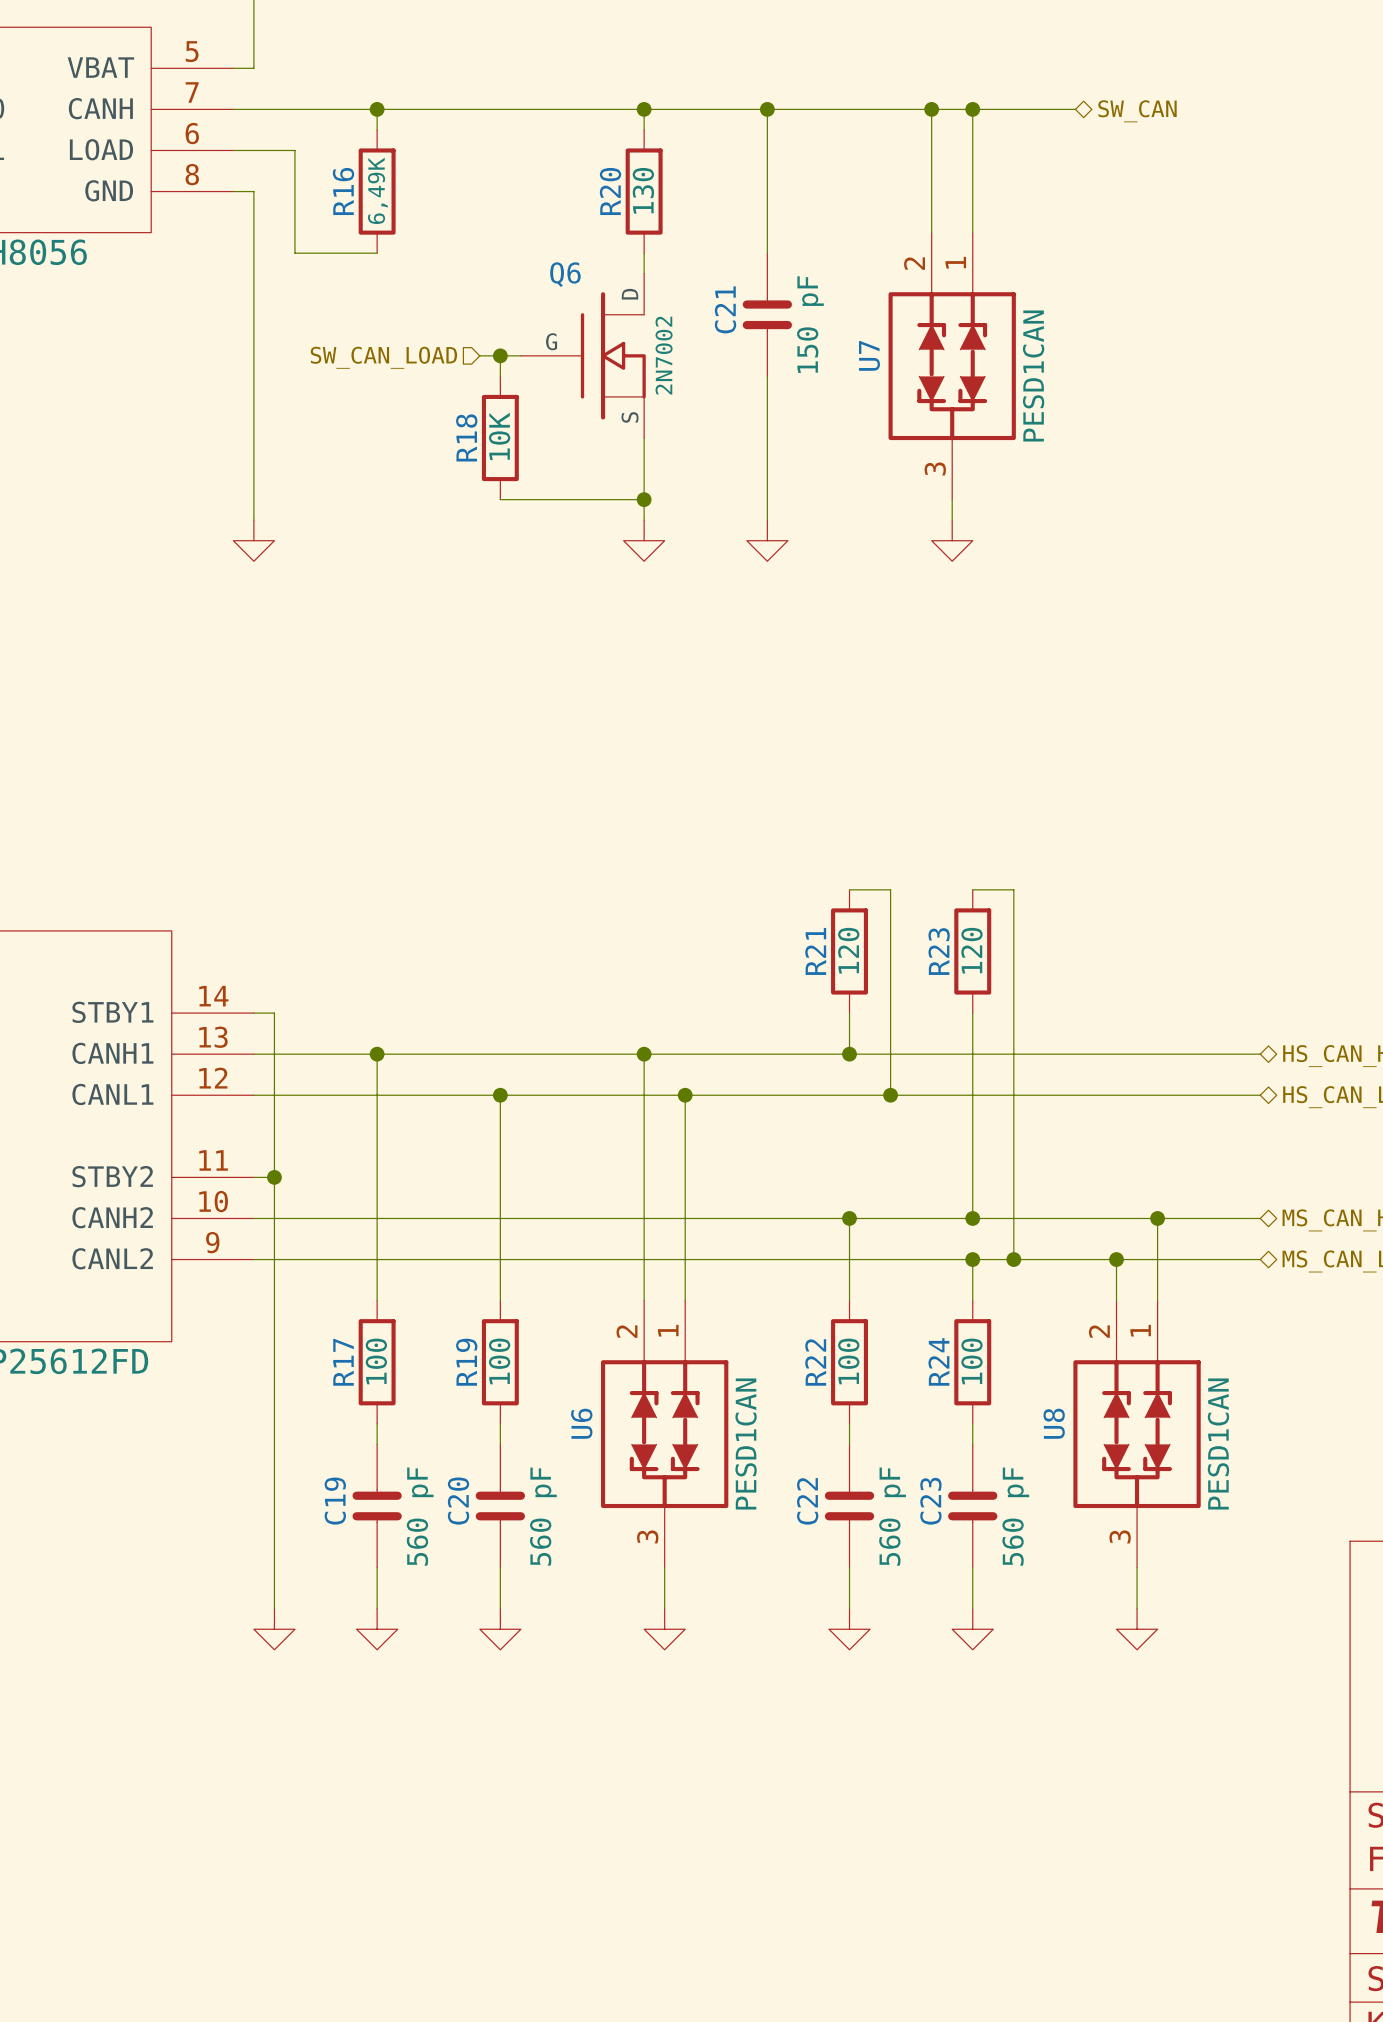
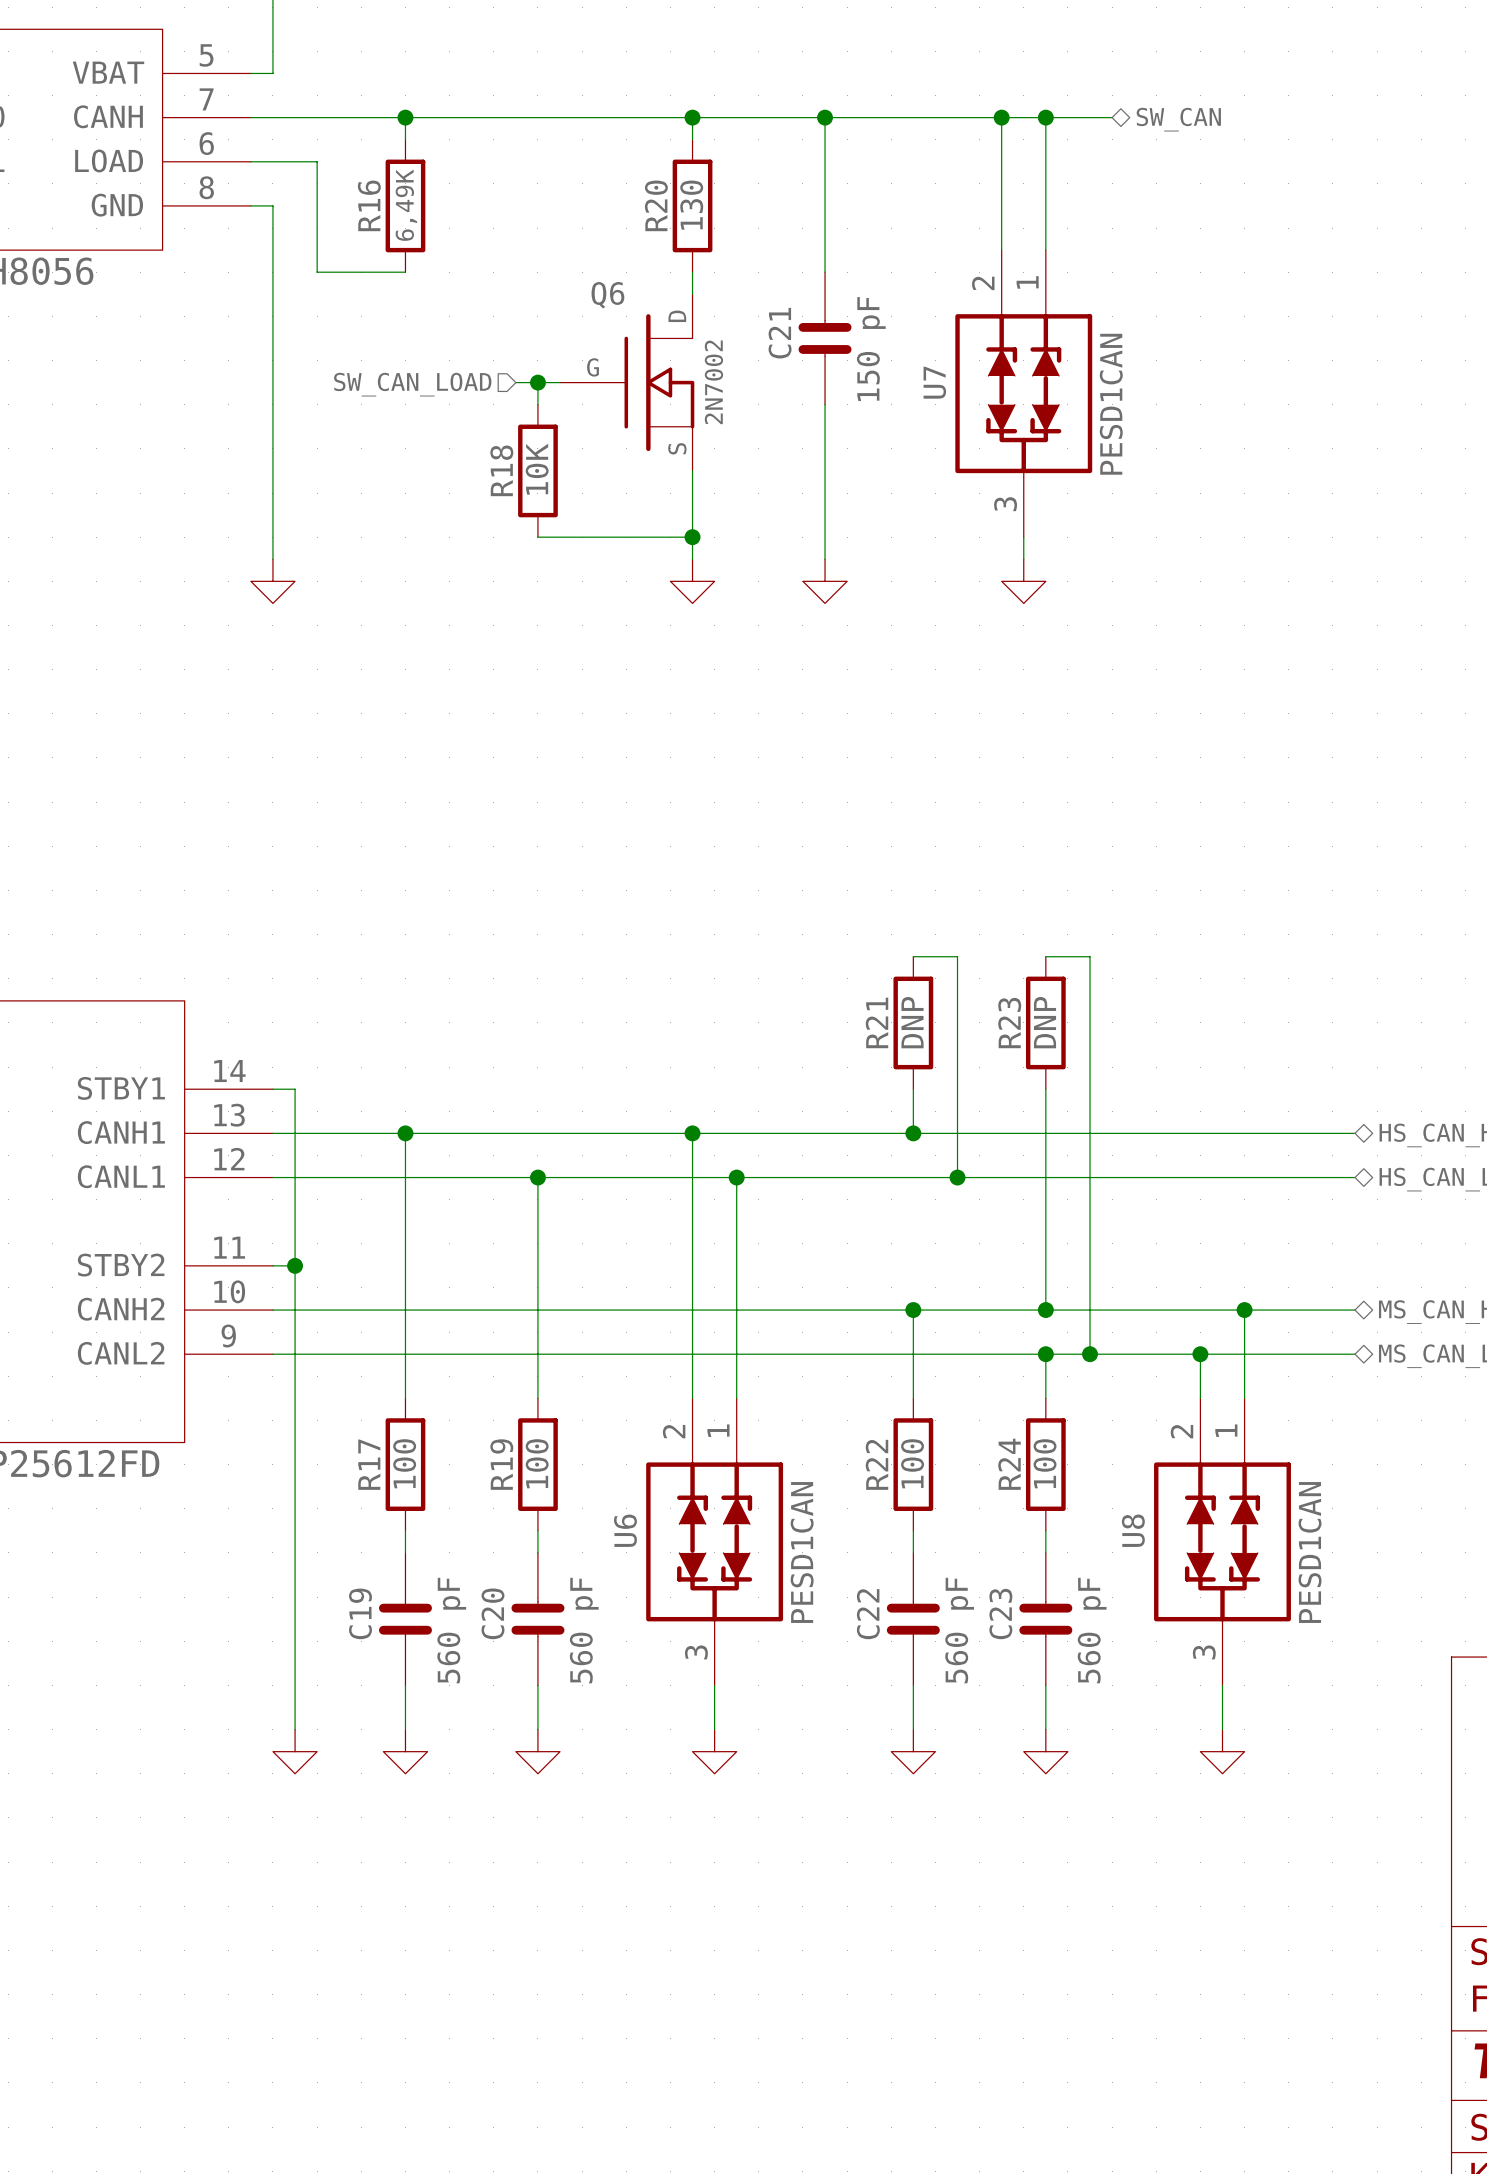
wire: (1034, 109) (1075, 109) -> none
hierarchical label position: SW_CAN (1137, 111) -> SW_CAN (1178, 119)
R21 value: 120 (848, 950) -> DNP (912, 1022)
R23 value: 120 (971, 950) -> DNP (1045, 1022)

